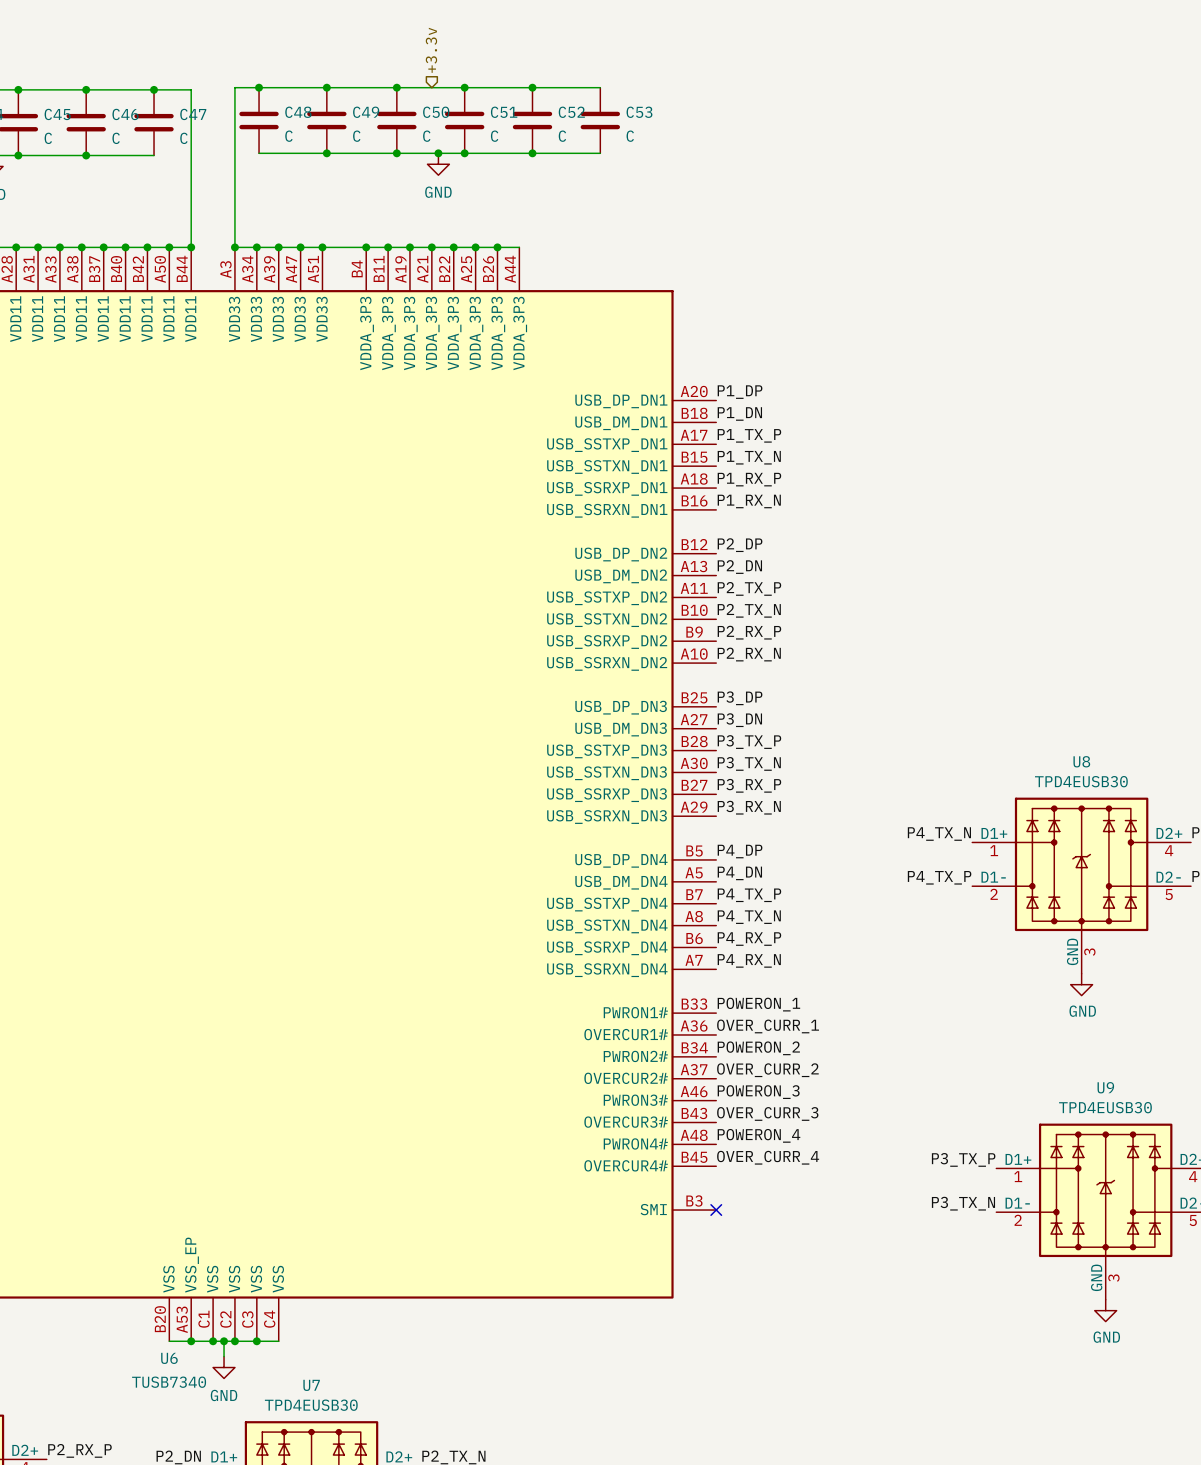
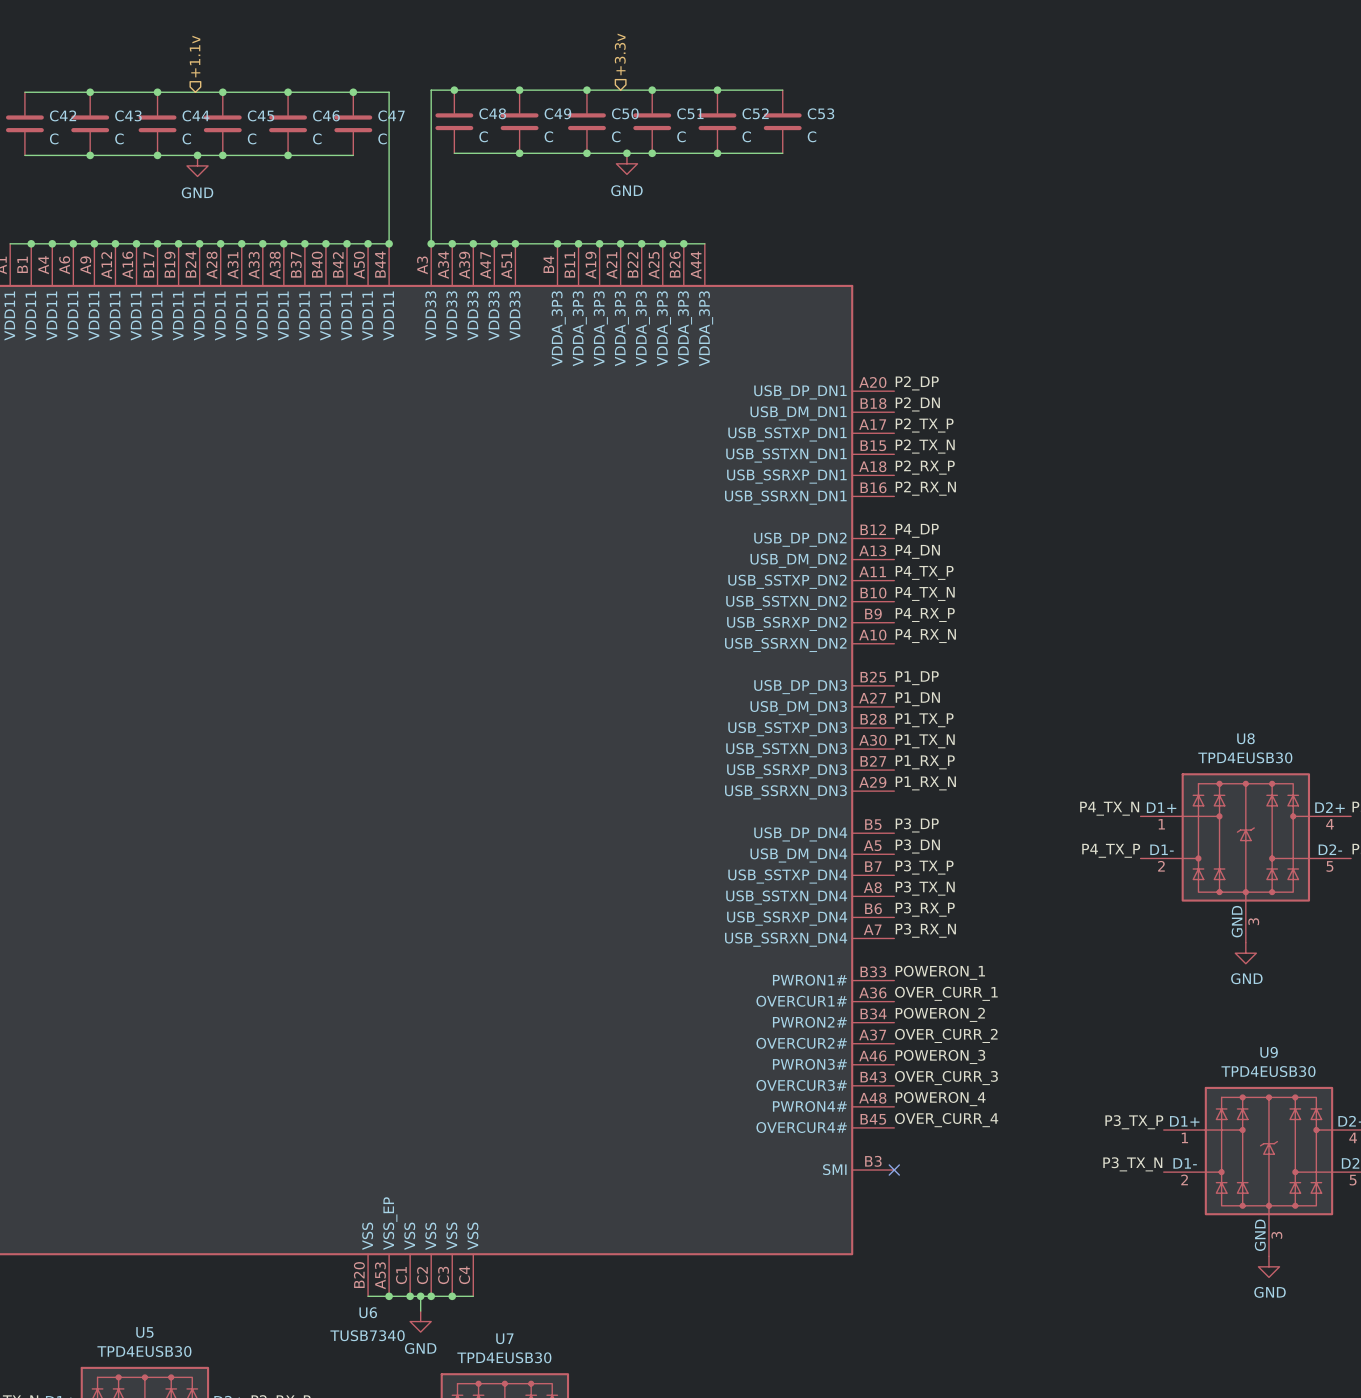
label: P1_DP (740, 392) -> P2_DP (917, 383)
label: P1_DN (739, 413) -> P2_DN (917, 404)
label: P1_TX_P (749, 435) -> P2_TX_P (924, 425)
label: P1_TX_N (749, 457) -> P2_TX_N (925, 446)
label: P1_RX_P (749, 479) -> P2_RX_P (925, 467)
label: P1_RX_N (749, 501) -> P2_RX_N (925, 488)
label: P2_DP (740, 545) -> P4_DP (917, 530)
label: P2_DN (739, 567) -> P4_DN (917, 551)
label: P2_TX_P (749, 588) -> P4_TX_P (924, 572)
label: P2_TX_N (749, 610) -> P4_TX_N (925, 593)
label: P2_RX_P (749, 632) -> P4_RX_P (925, 615)
label: P2_RX_N (749, 654) -> P4_RX_N (925, 636)
label: P3_DP (740, 698) -> P1_DP (917, 678)
label: P3_DN (739, 720) -> P1_DN (917, 699)
label: P3_TX_P (749, 742) -> P1_TX_P (924, 720)
label: P3_TX_N (749, 763) -> P1_TX_N (925, 741)
label: P3_RX_P (749, 785) -> P1_RX_P (925, 762)
label: P3_RX_N (749, 807) -> P1_RX_N (925, 783)
label: P4_DP (740, 851) -> P3_DP (917, 825)
label: P4_DN (739, 873) -> P3_DN (917, 846)
label: P4_TX_P (749, 895) -> P3_TX_P (924, 867)
label: P4_TX_N (749, 917) -> P3_TX_N (925, 888)
label: P4_RX_P (749, 939) -> P3_RX_P (925, 909)
label: P4_RX_N (749, 960) -> P3_RX_N (925, 930)

